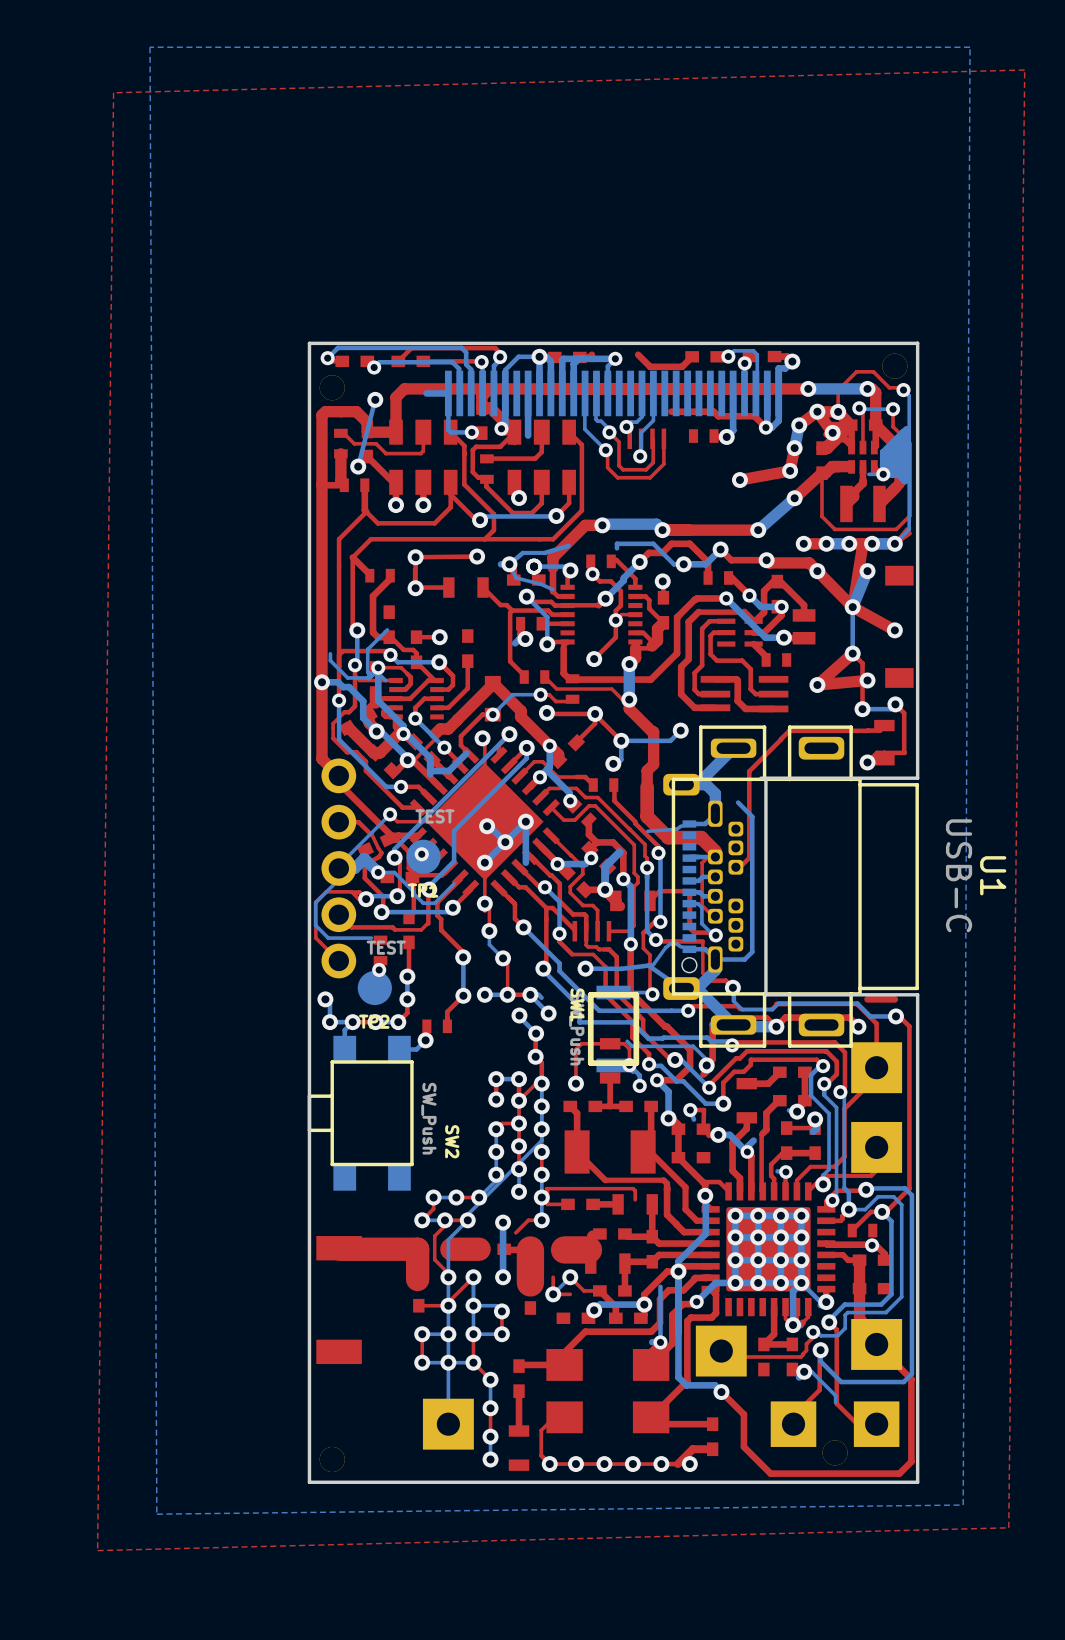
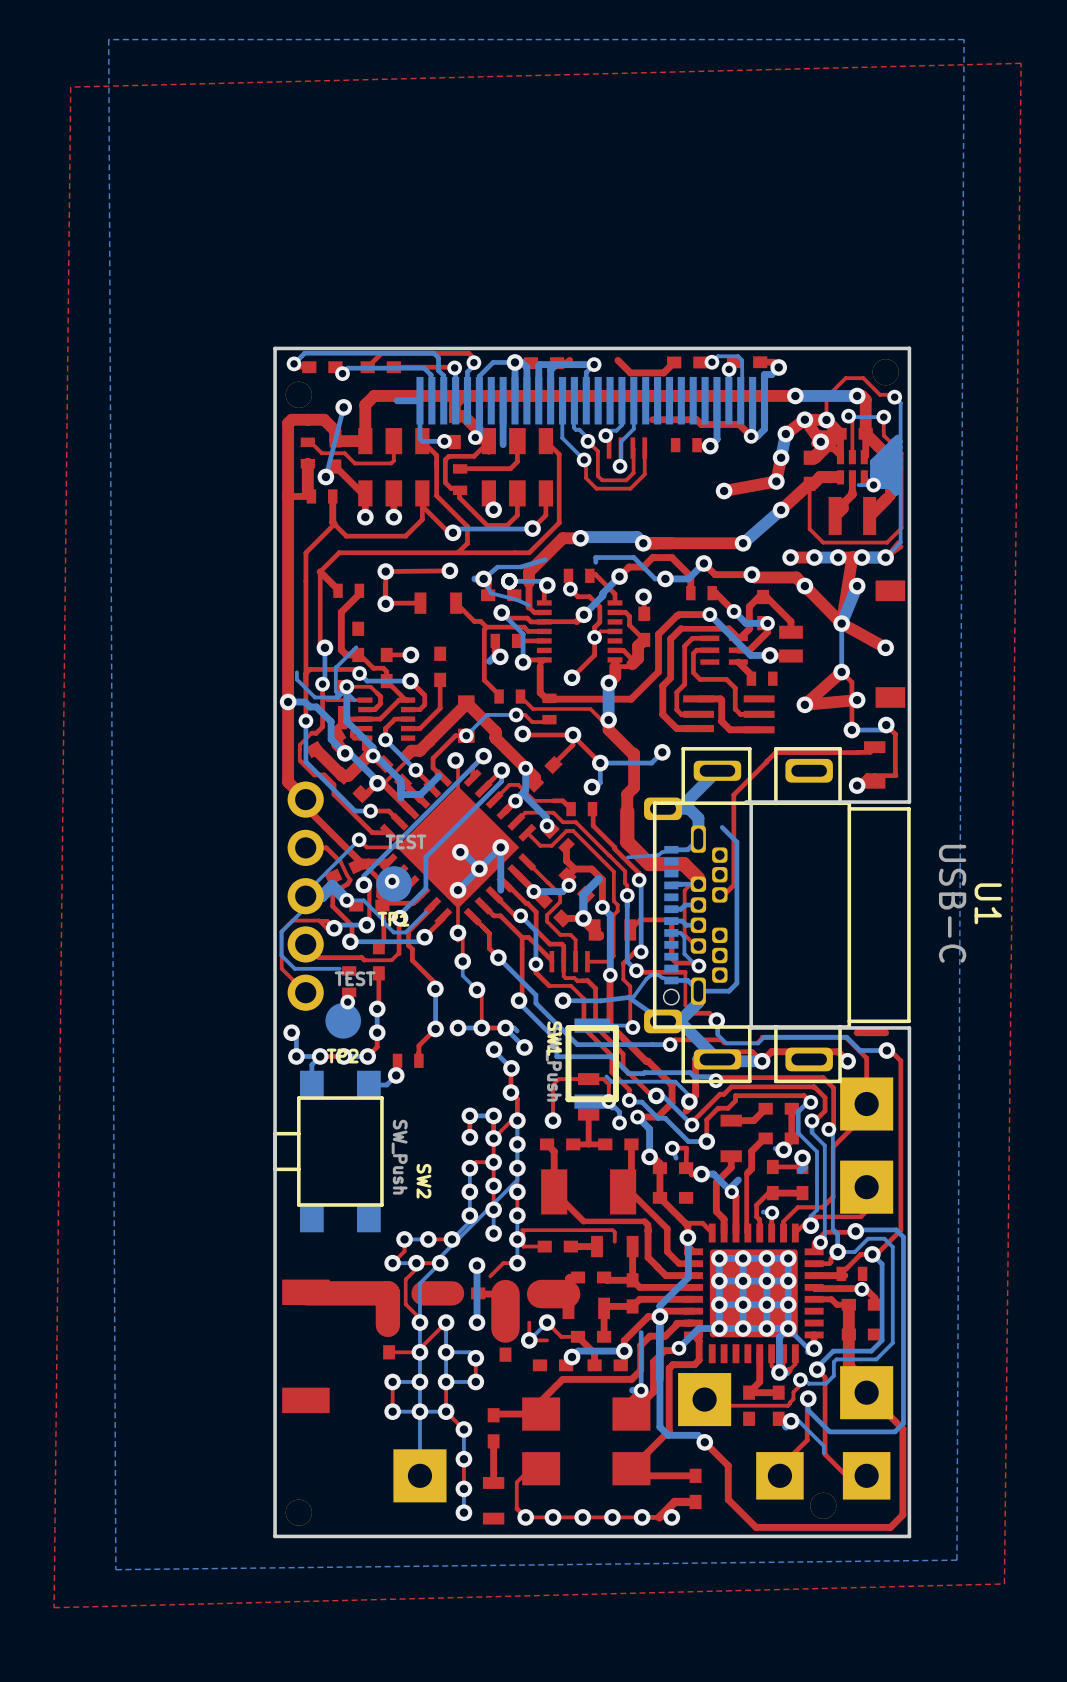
top track: none -> (844, 1275) (814, 1275)

